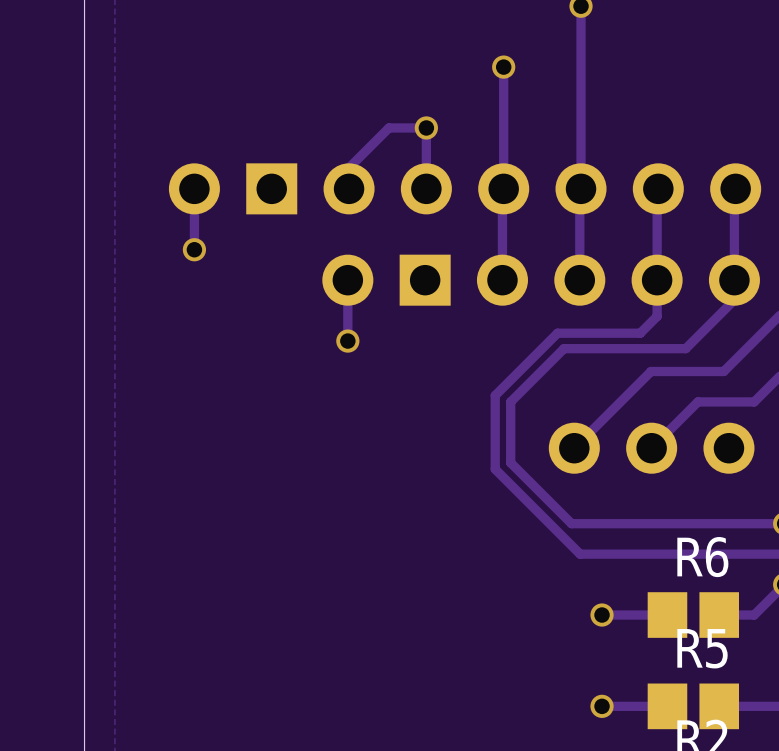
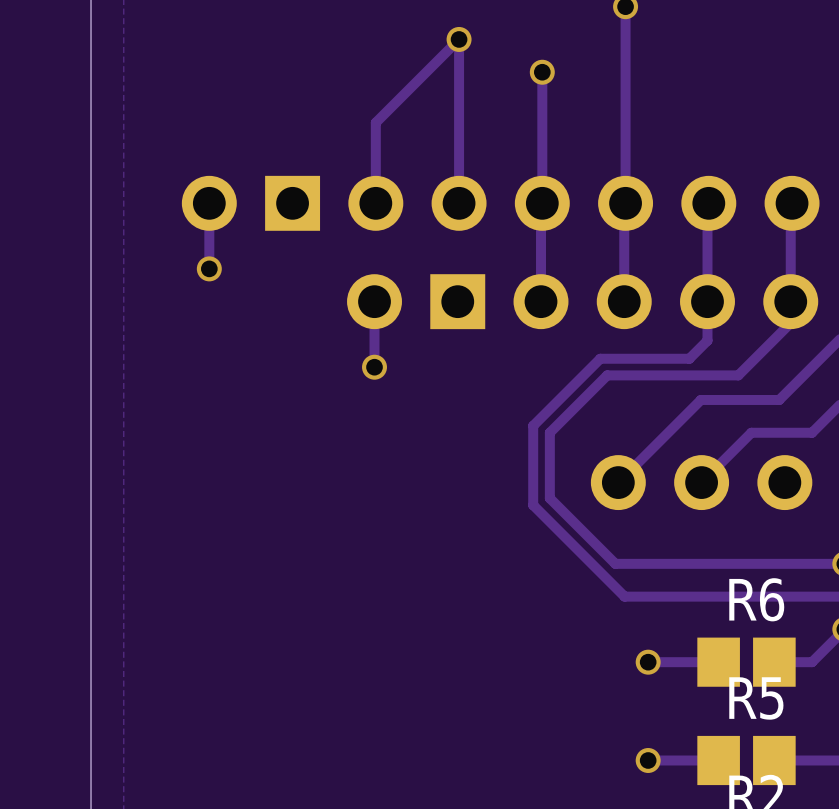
track: (426, 127) (388, 127) (349, 167) -> (459, 137) (459, 39) (375, 122) (375, 180)
via position: (426, 127) -> (459, 39)

